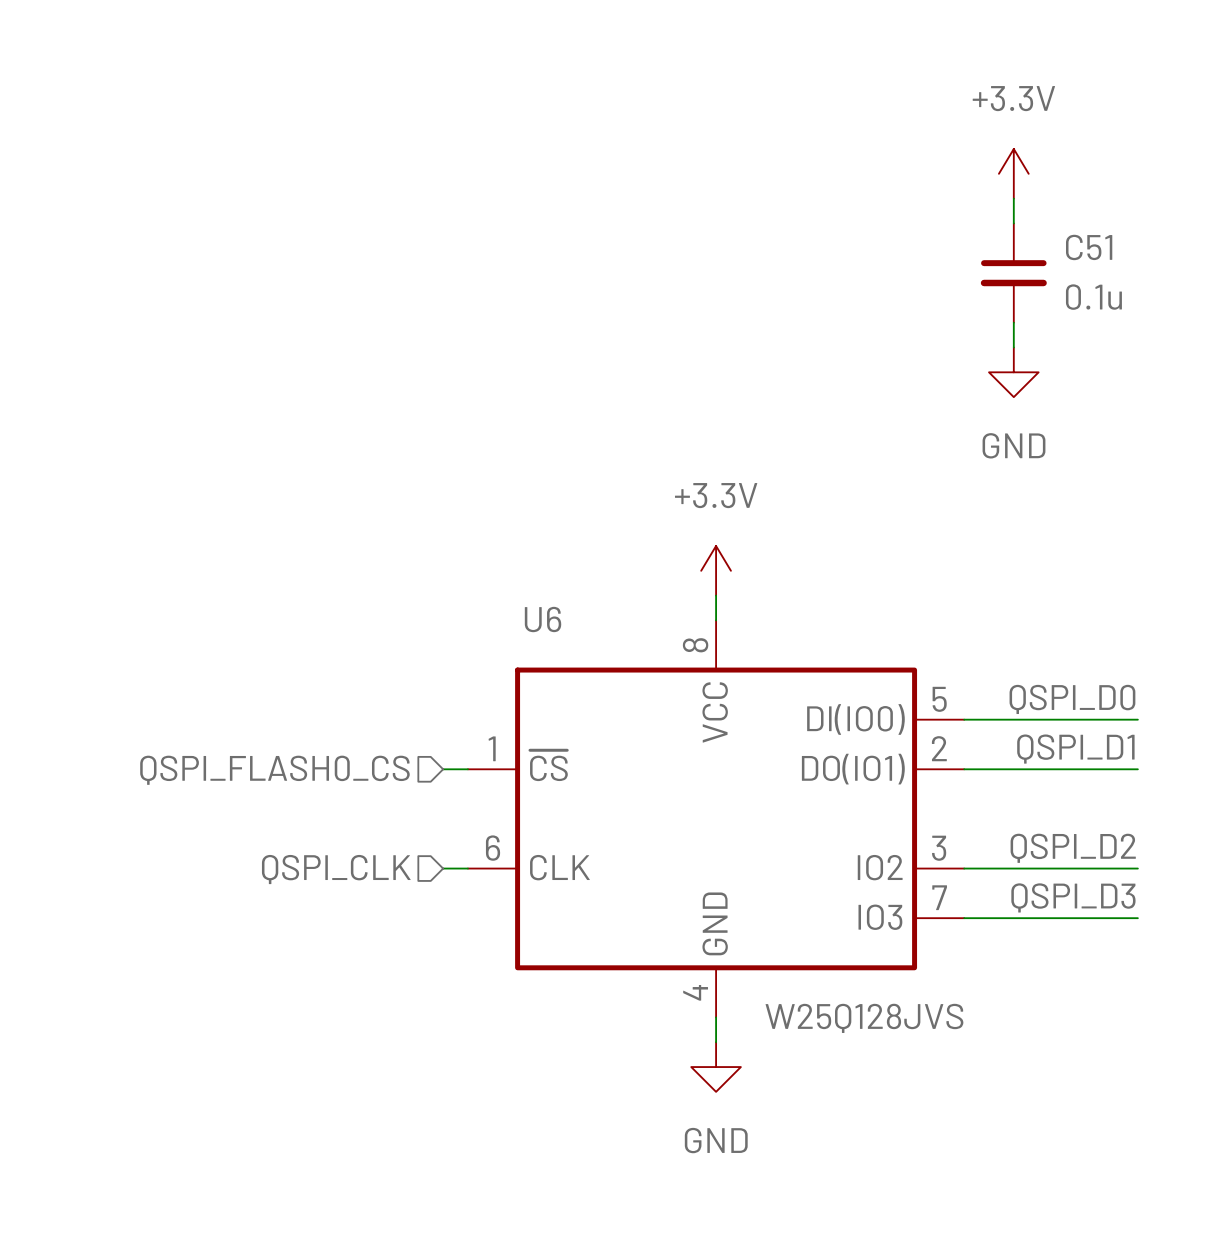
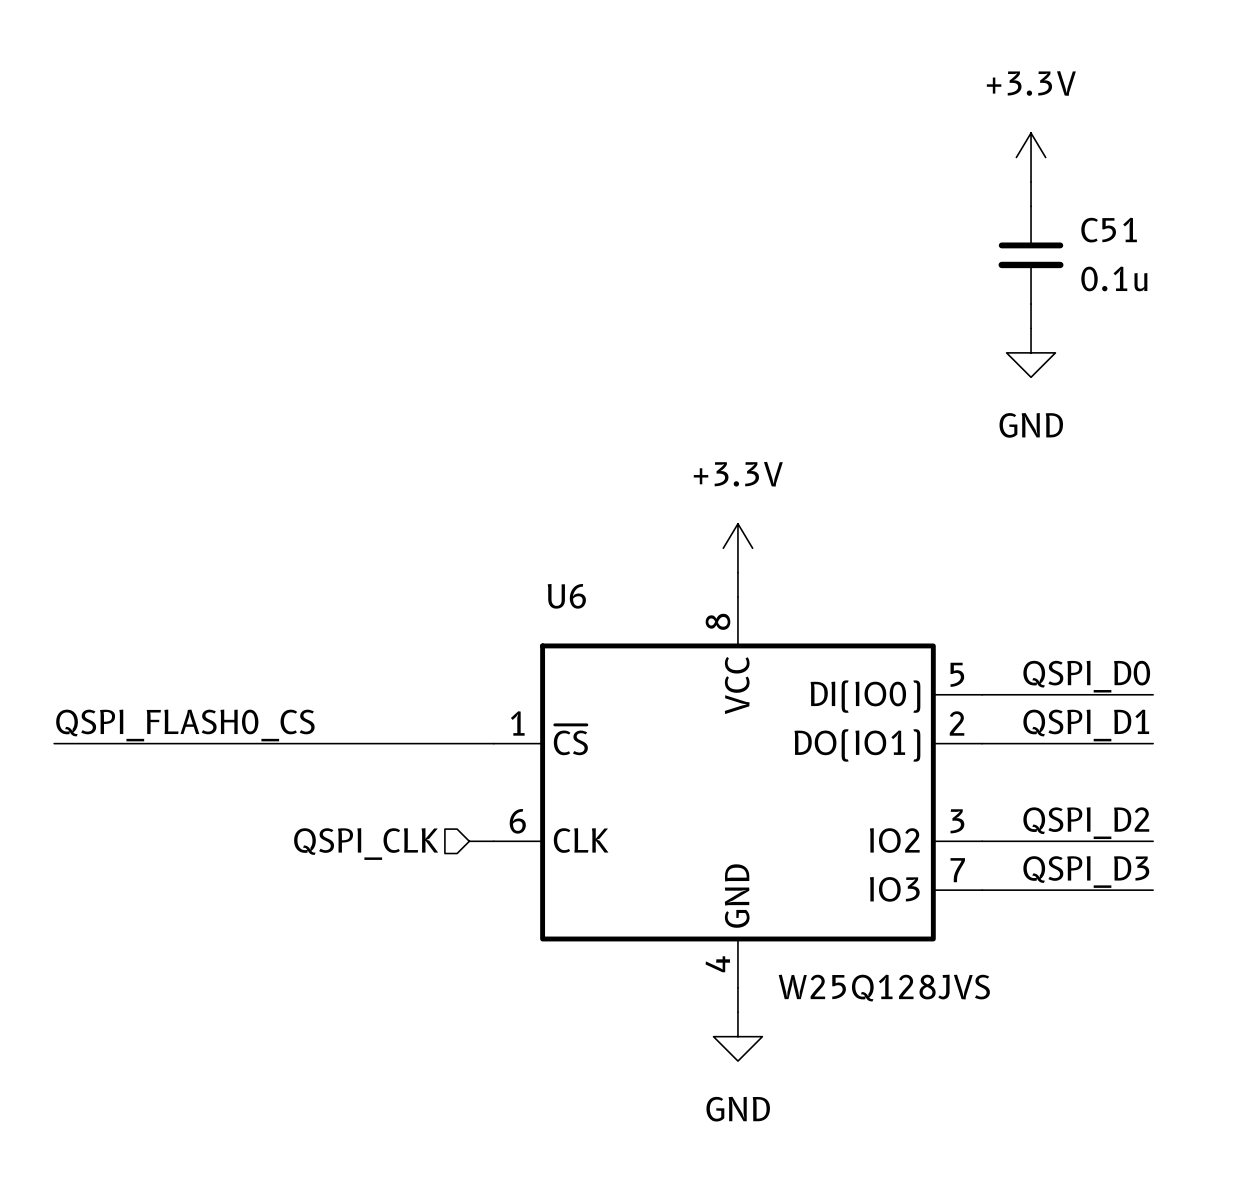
label: none -> QSPI_FLASH0_CS (185, 725)
wire: none -> (54, 743) (469, 743)
hierarchical label: QSPI_FLASH0_CS (274, 770) -> none

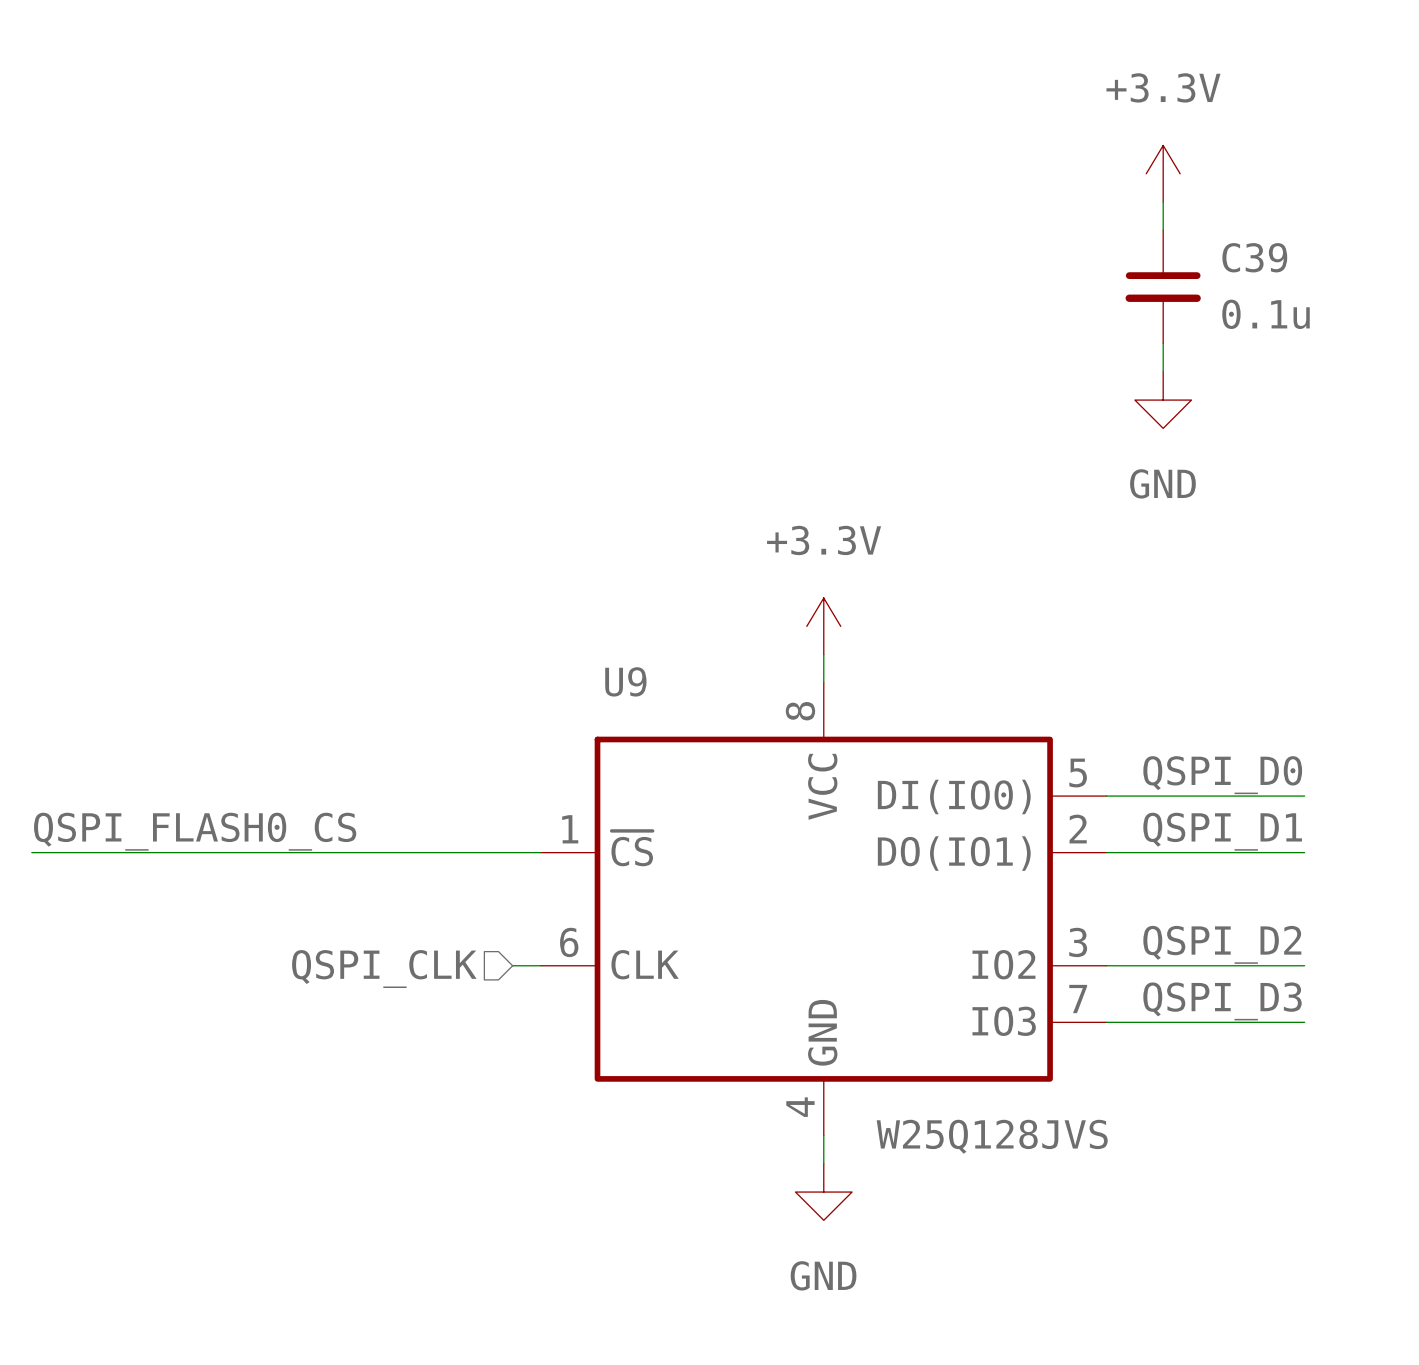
C51 name: C51 (1109, 230) -> C39 (1254, 257)
U6 name: U6 (566, 596) -> U9 (625, 681)

